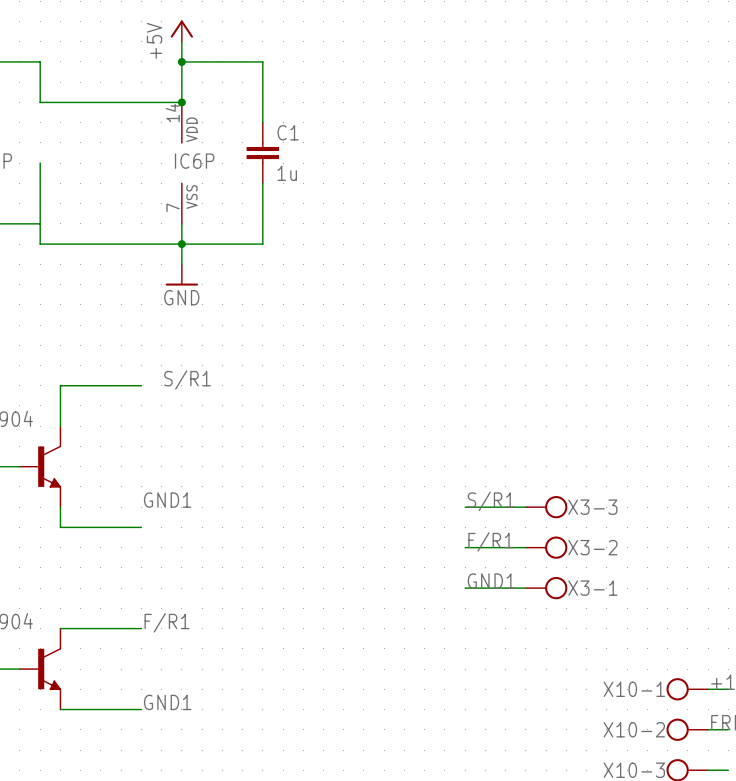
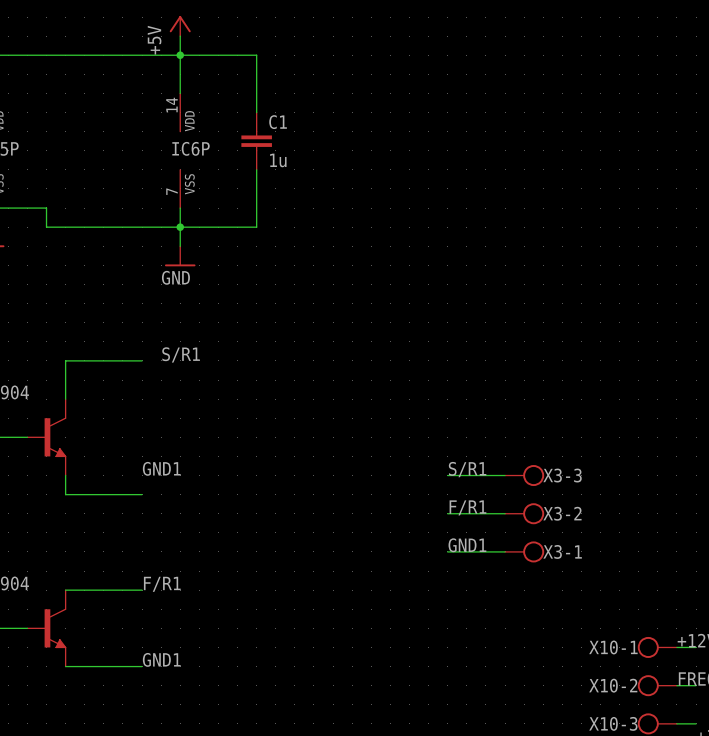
wire: (40, 61) (40, 102) (181, 102) -> (46, 55) (180, 55)
junction: (181, 102) -> none
wire: (40, 163) (40, 223) -> none

